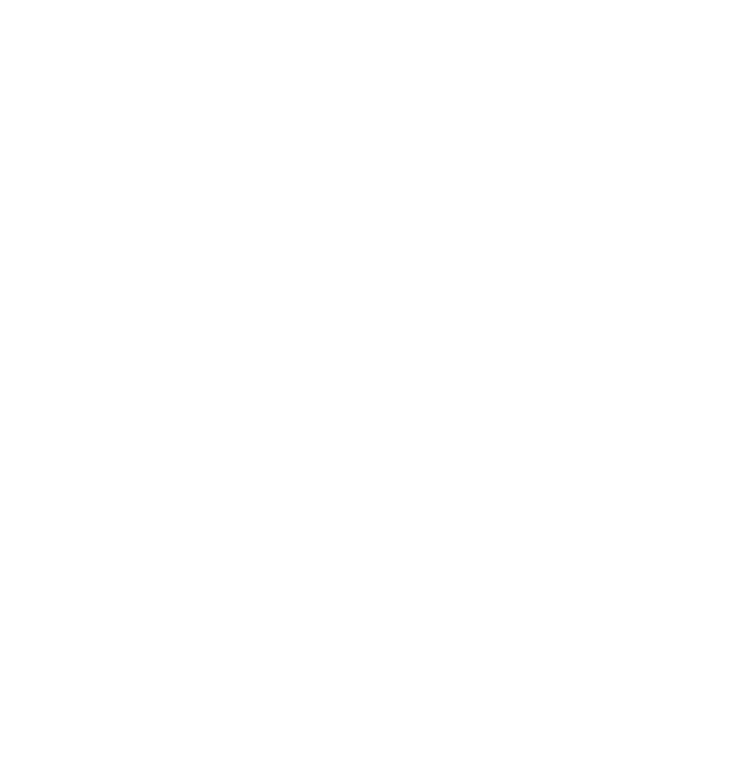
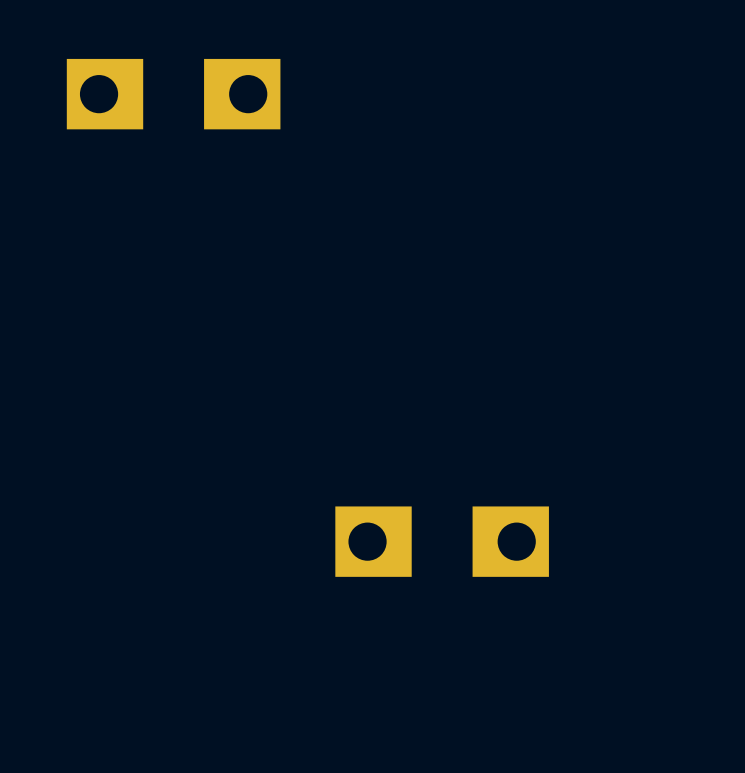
part: none -> (173, 94)
part: none -> (442, 541)

